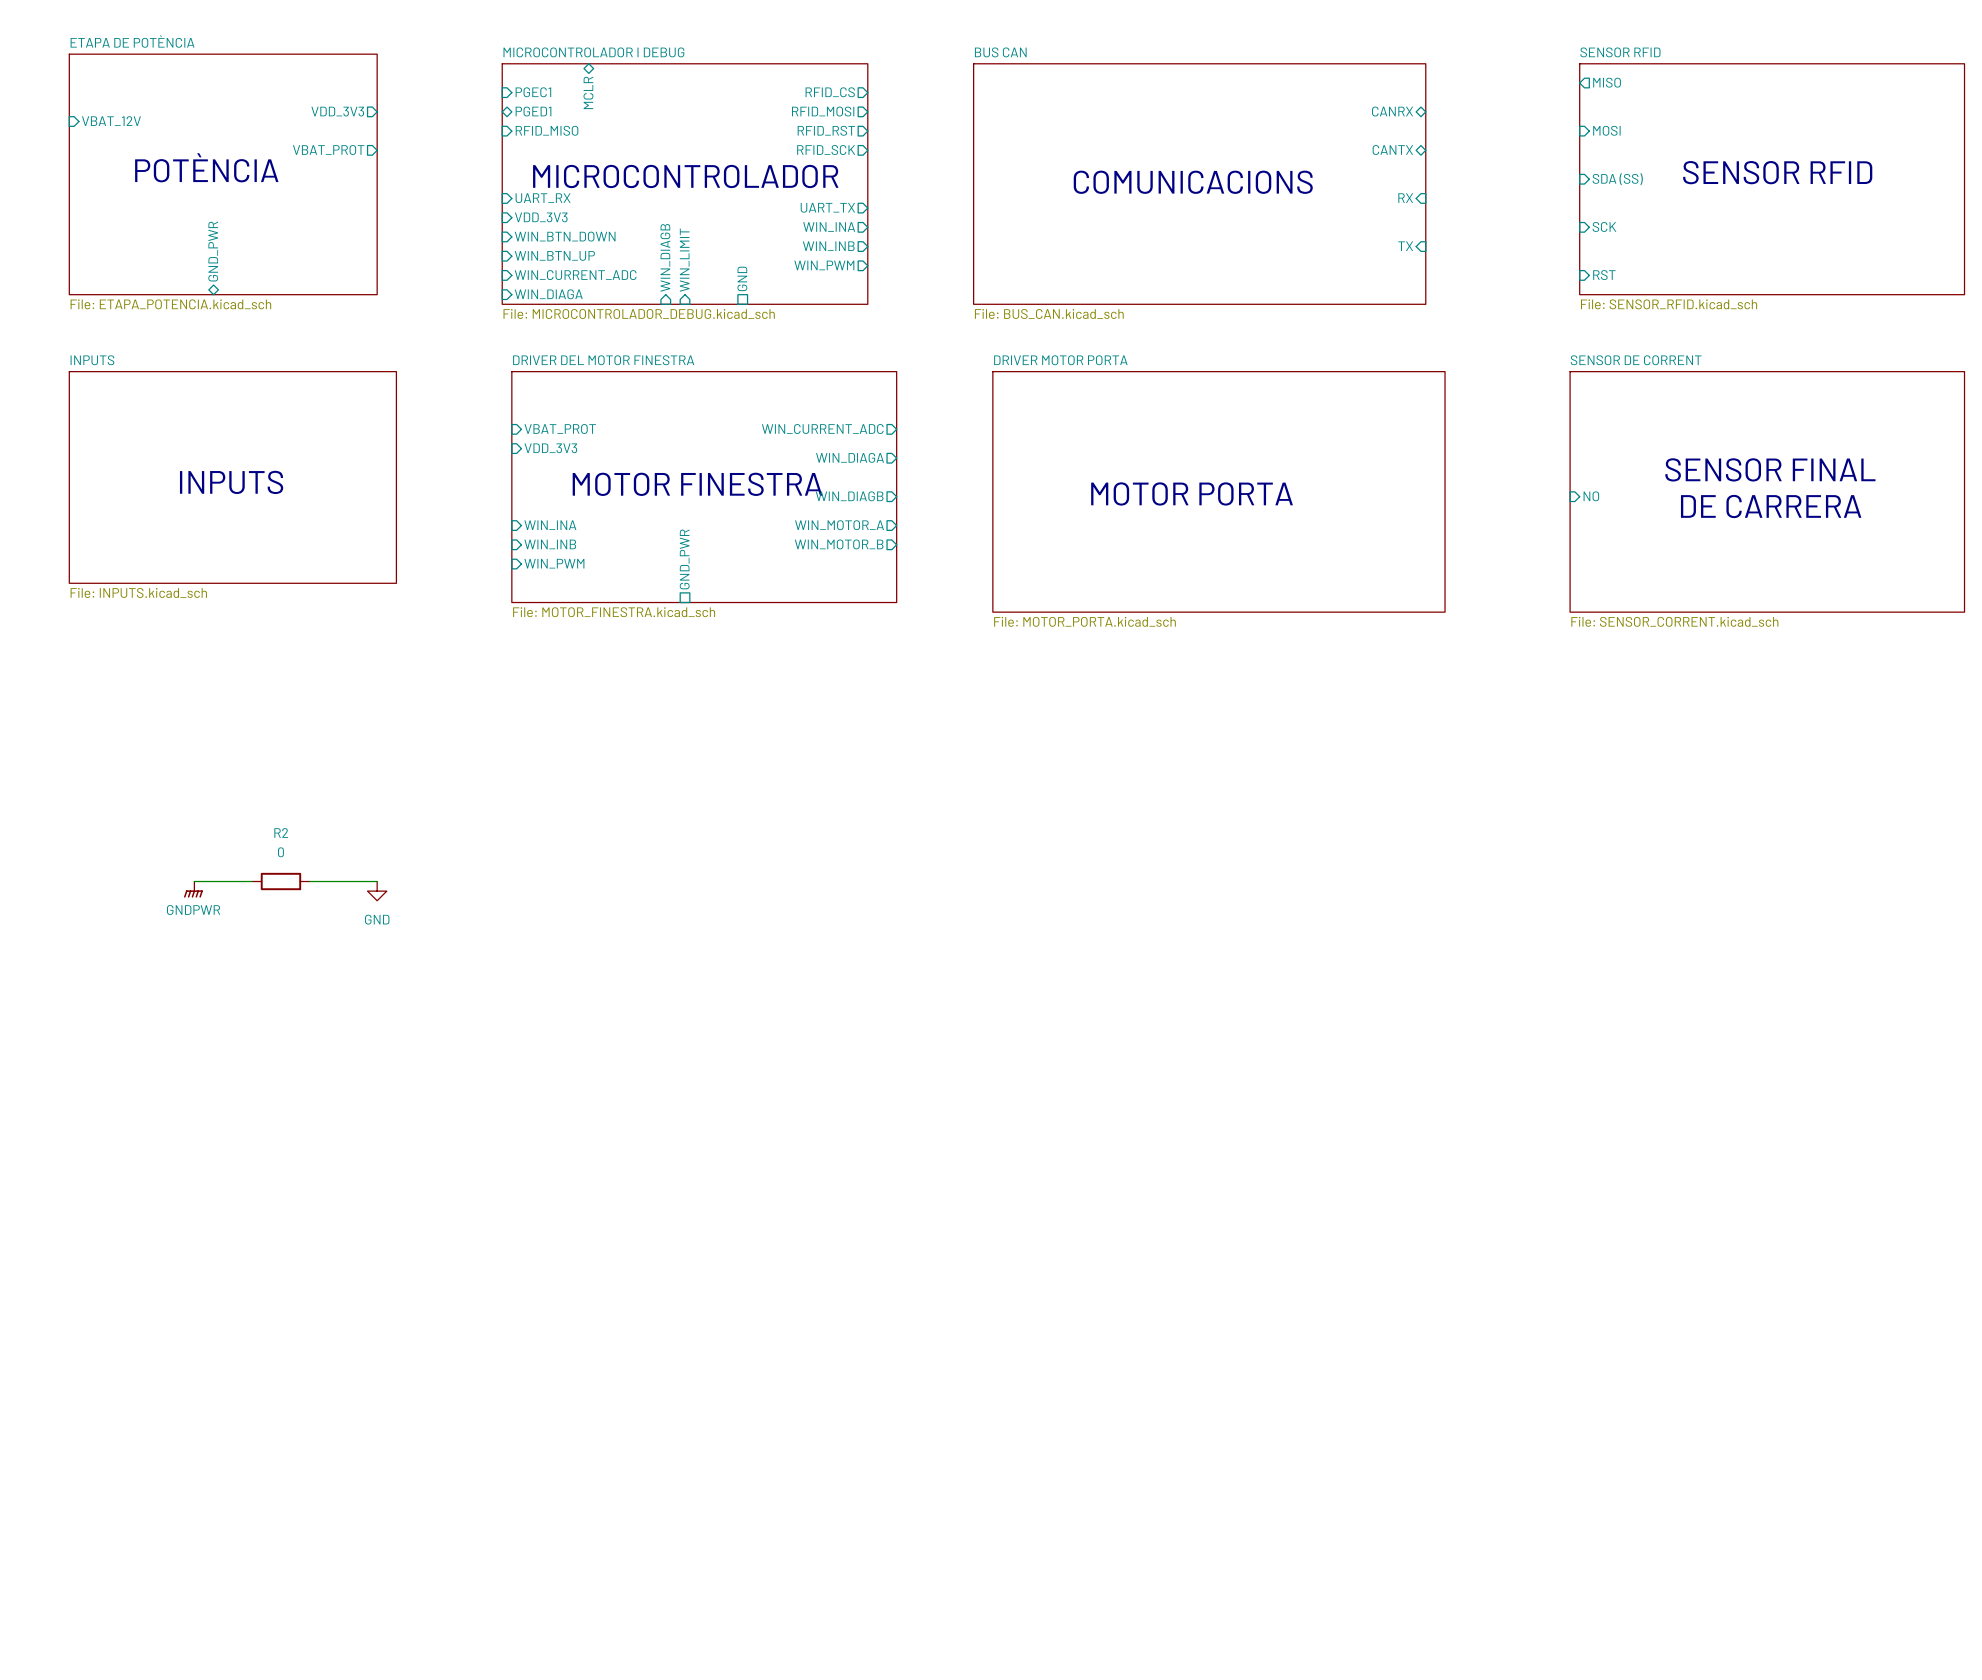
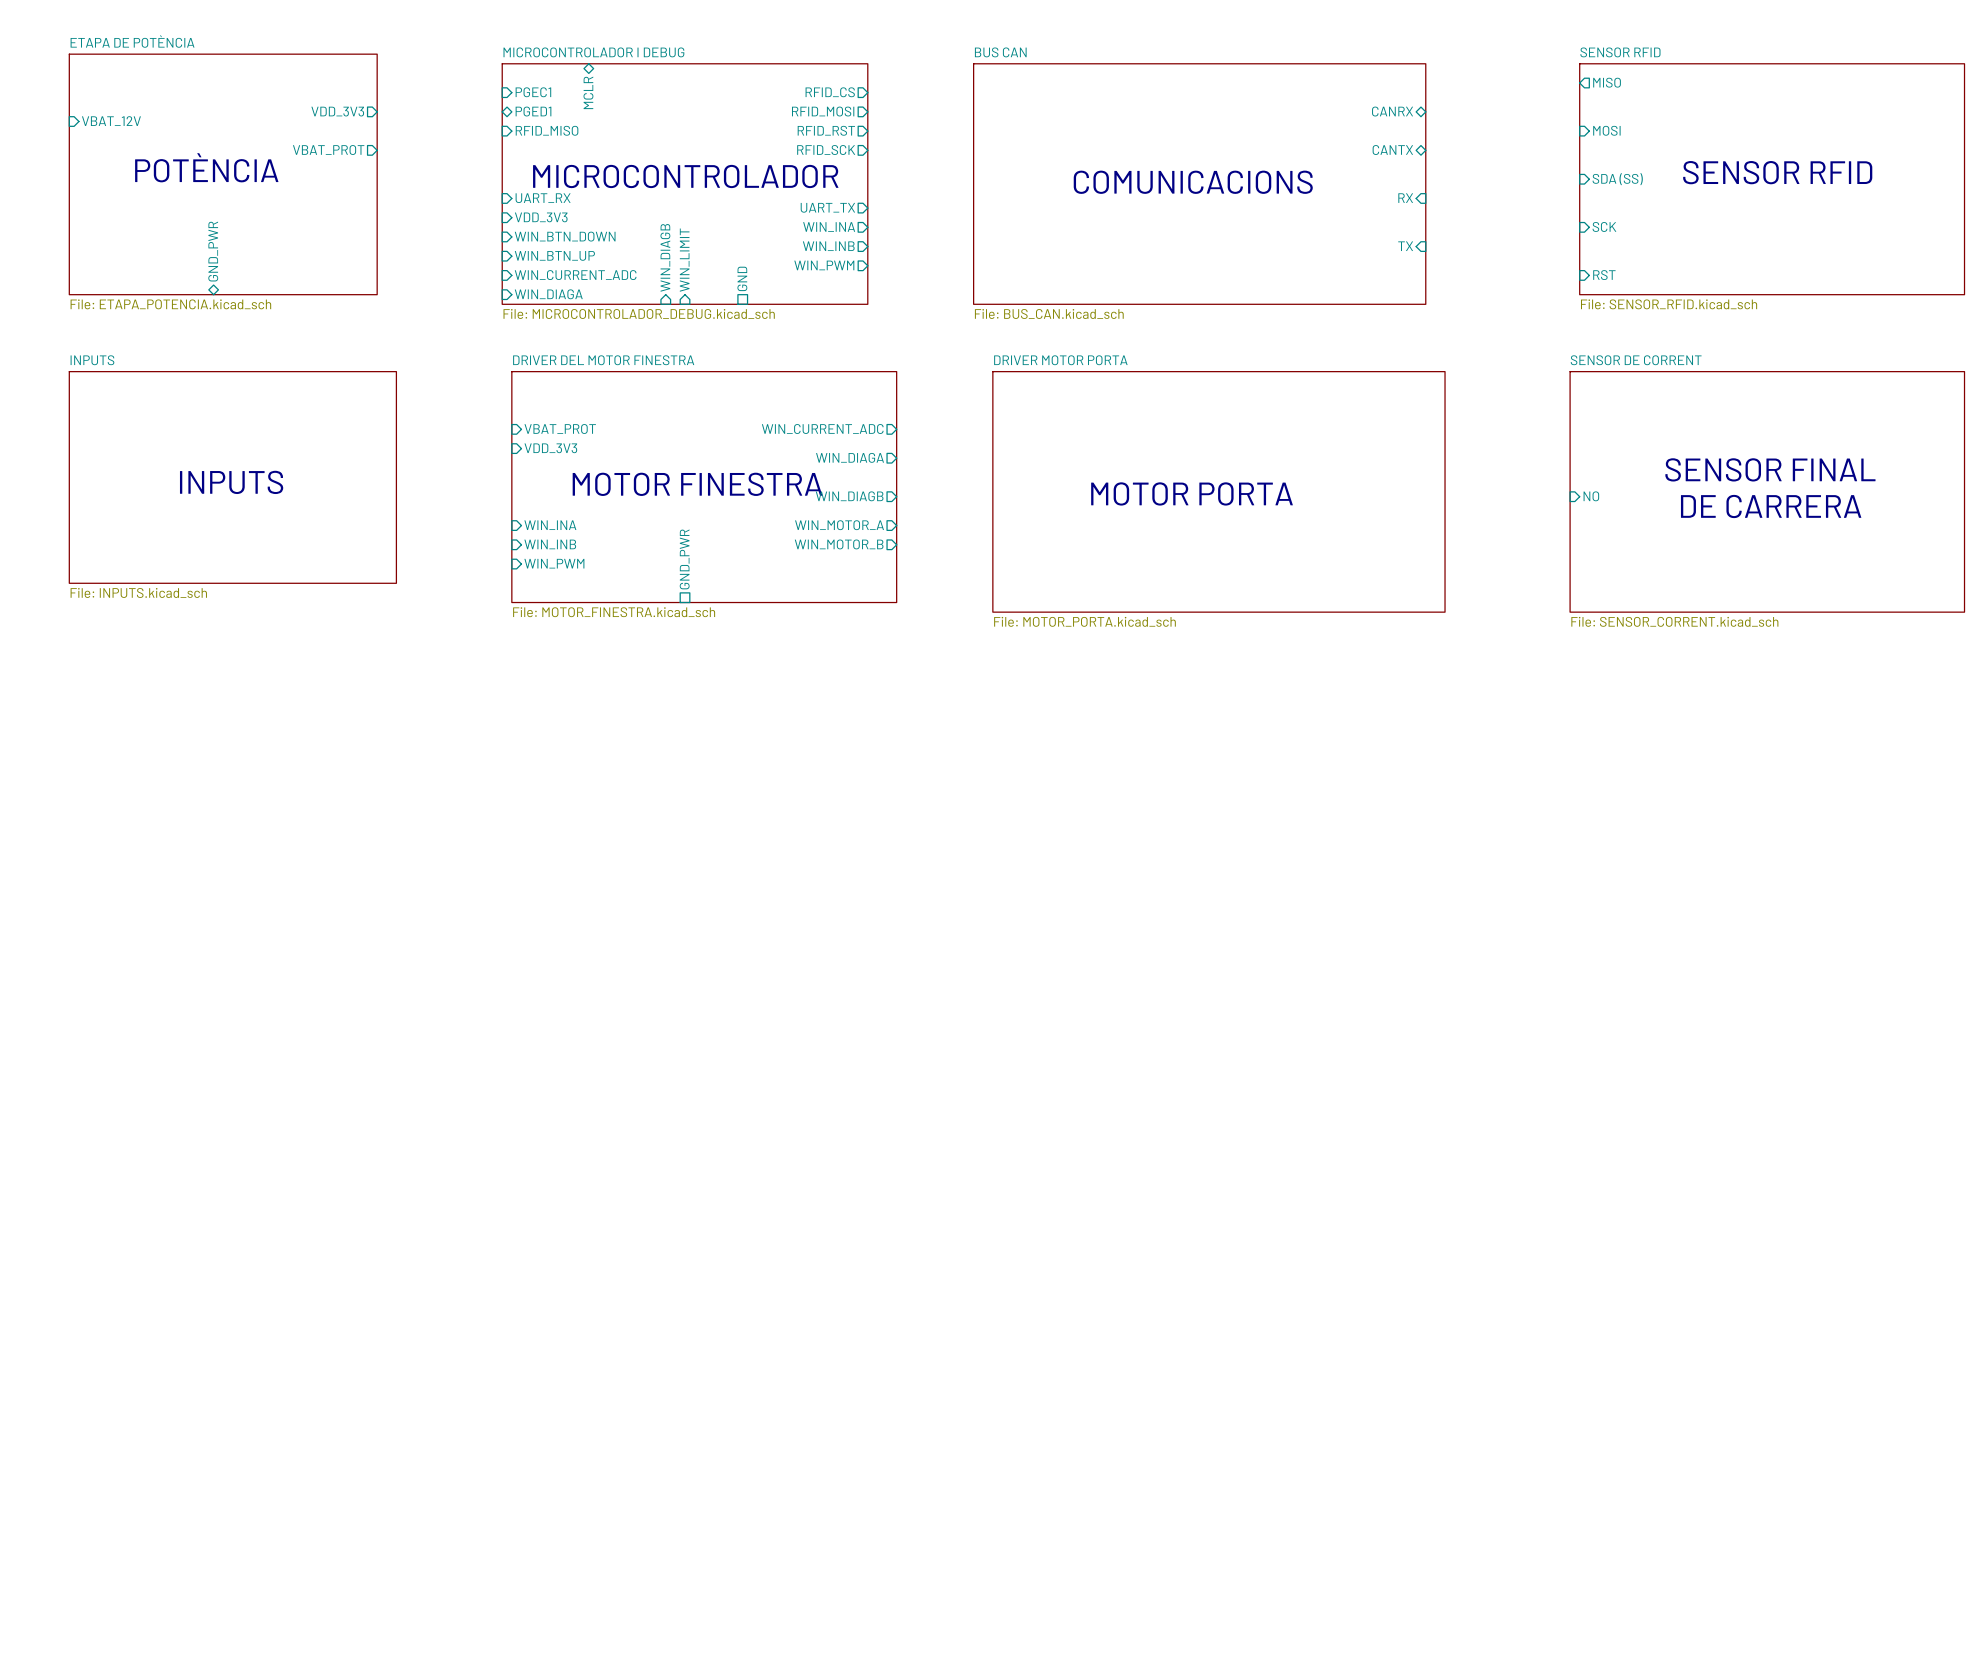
wire: (194, 881) (252, 881) -> none
R2: 0 (280, 881) -> none
wire: (309, 881) (377, 881) -> none
power symbol: GNDPWR (193, 889) -> none
power symbol: GND (377, 891) -> none

